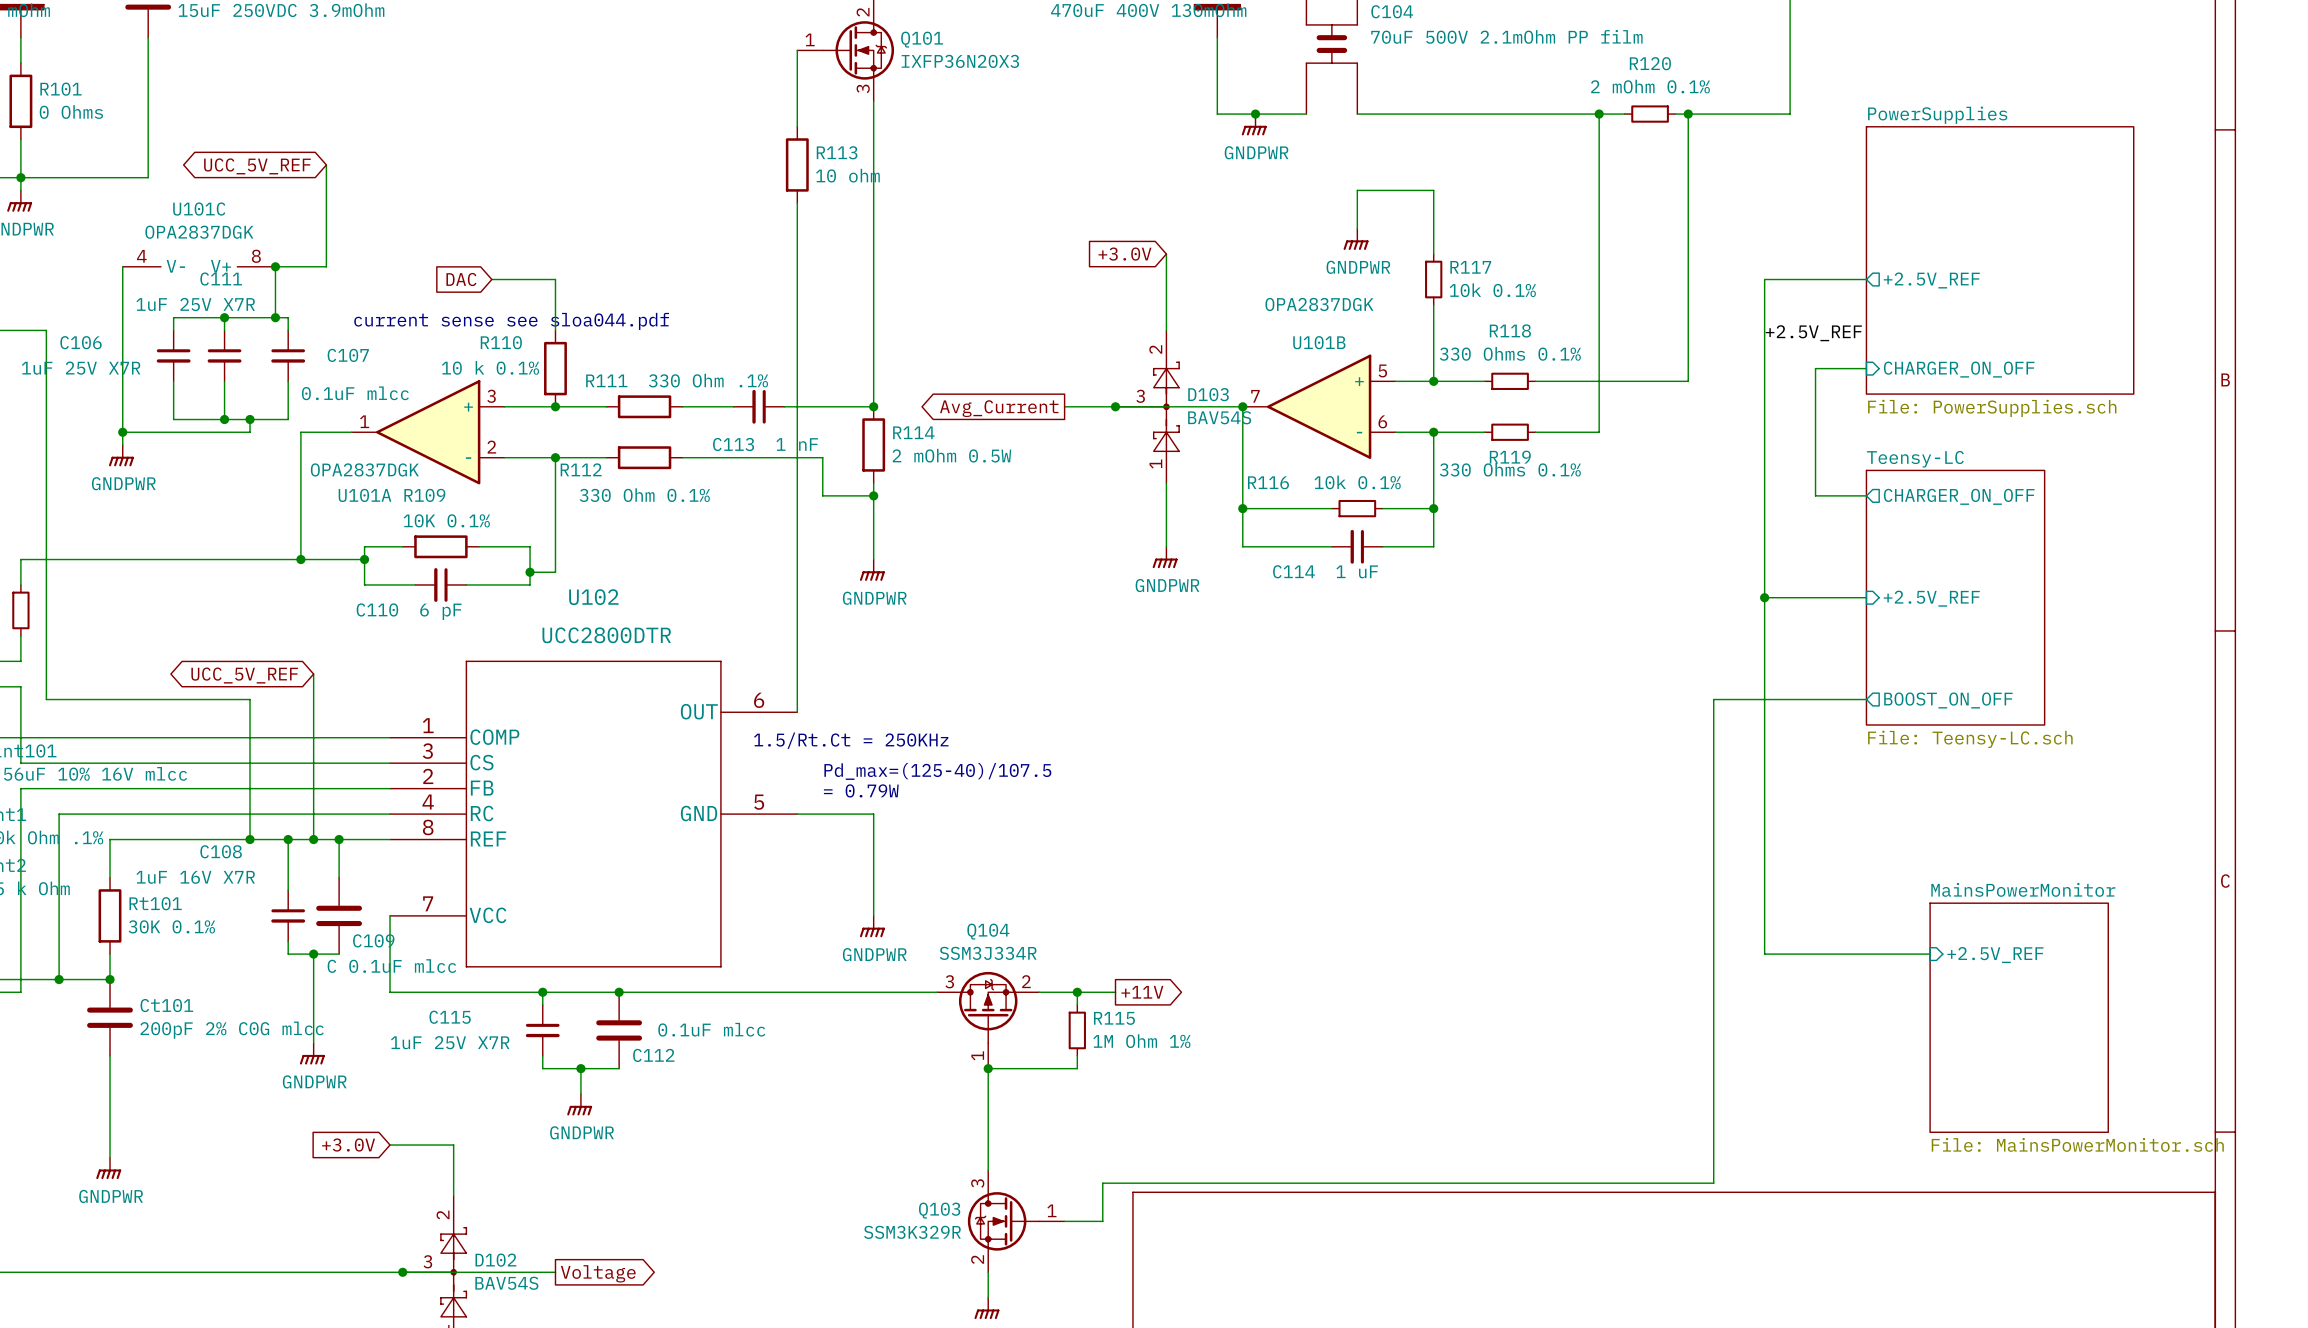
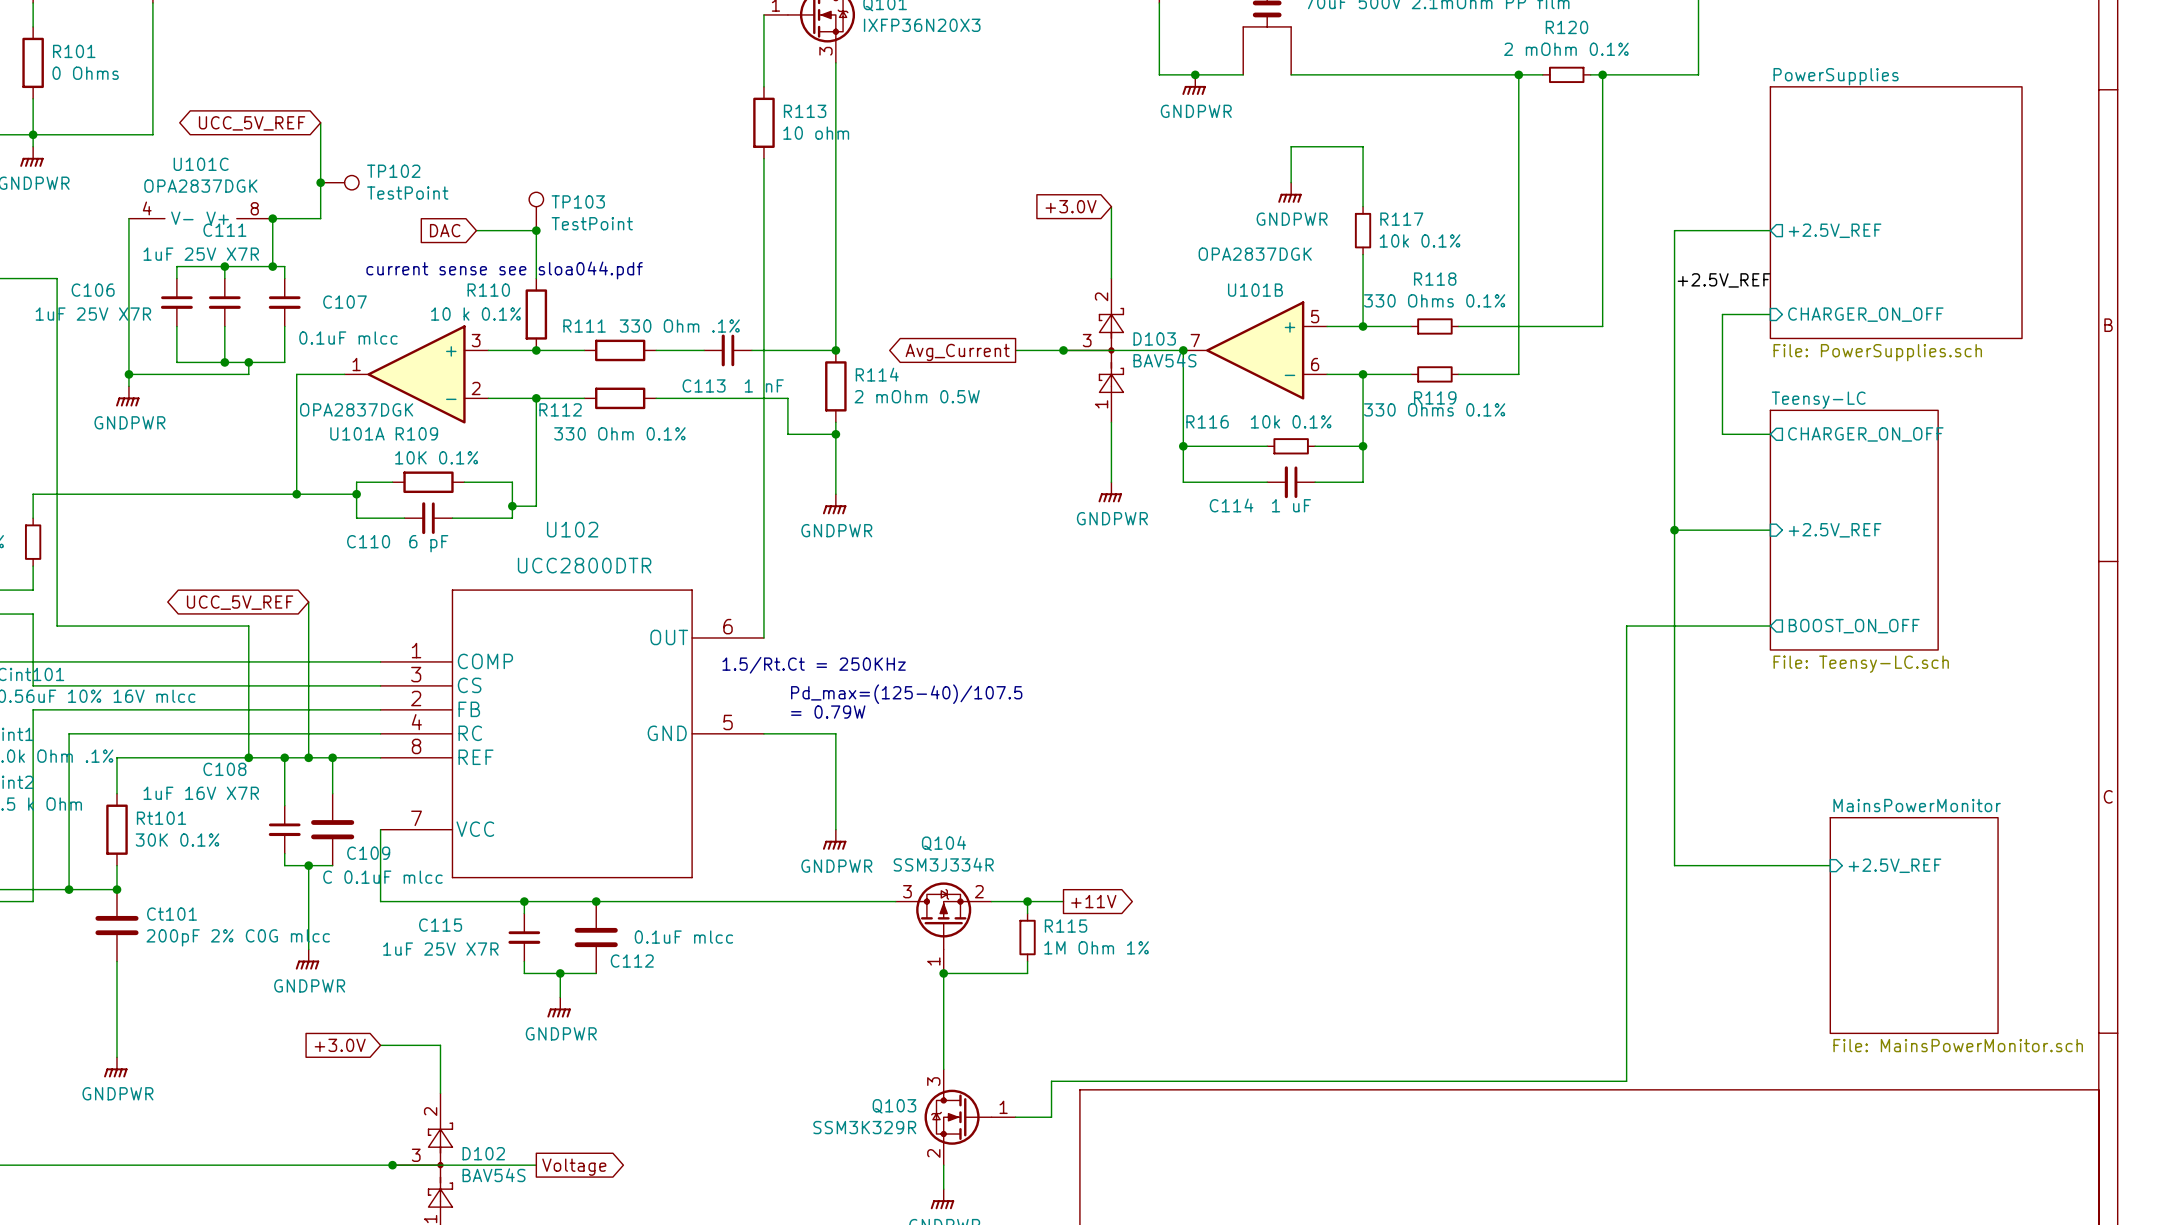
junction: none -> (320, 182)
TP102: none -> TestPoint (339, 182)
TP103: none -> TestPoint (536, 211)
junction: none -> (536, 230)

